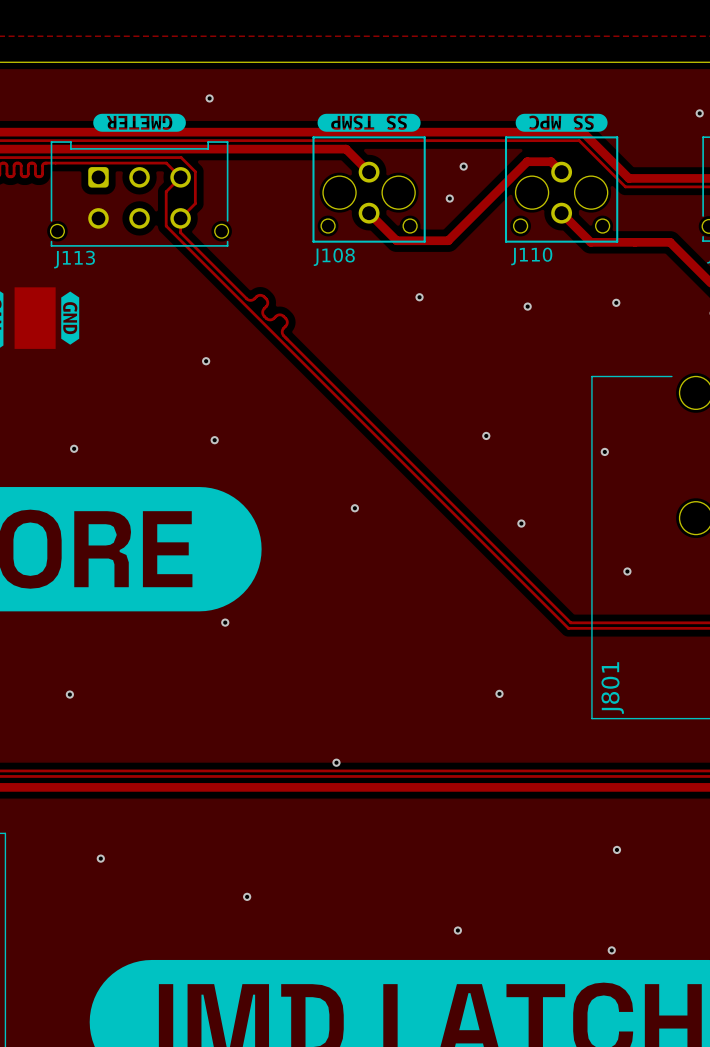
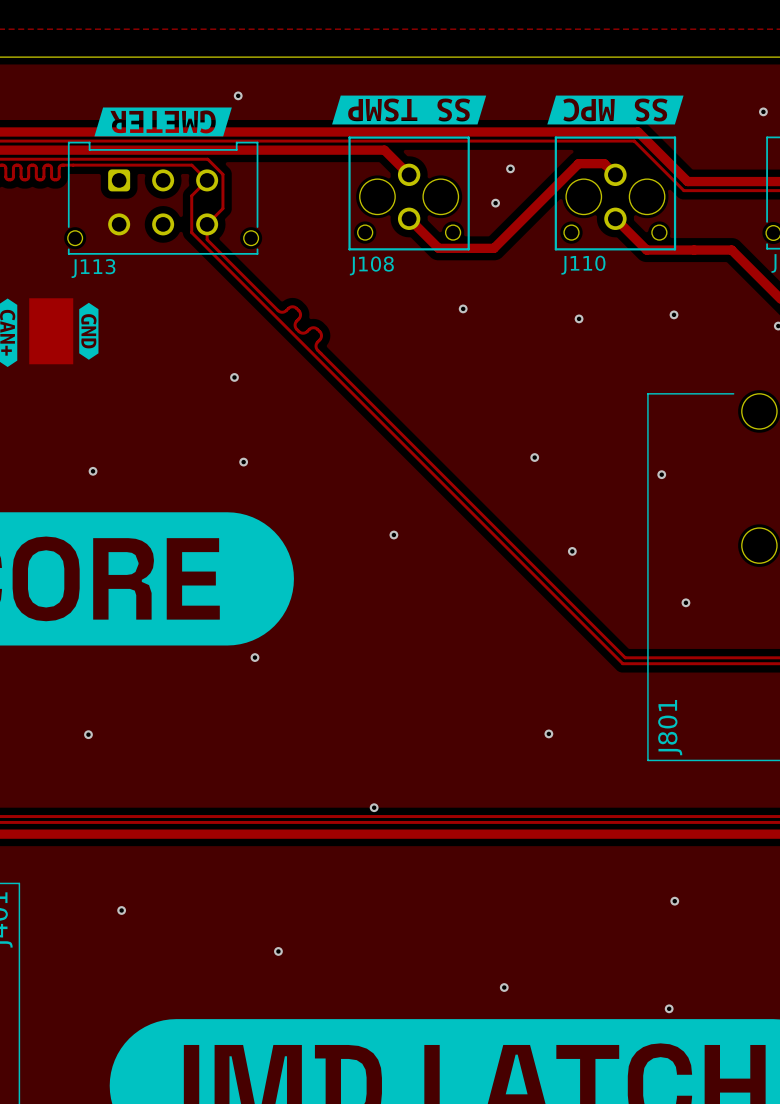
drawing shape: [93, 113, 186, 132] -> [94, 107, 232, 137]
drawing shape: [317, 113, 421, 132] -> [332, 95, 487, 125]
drawing shape: [515, 113, 608, 132] -> [547, 95, 684, 125]

